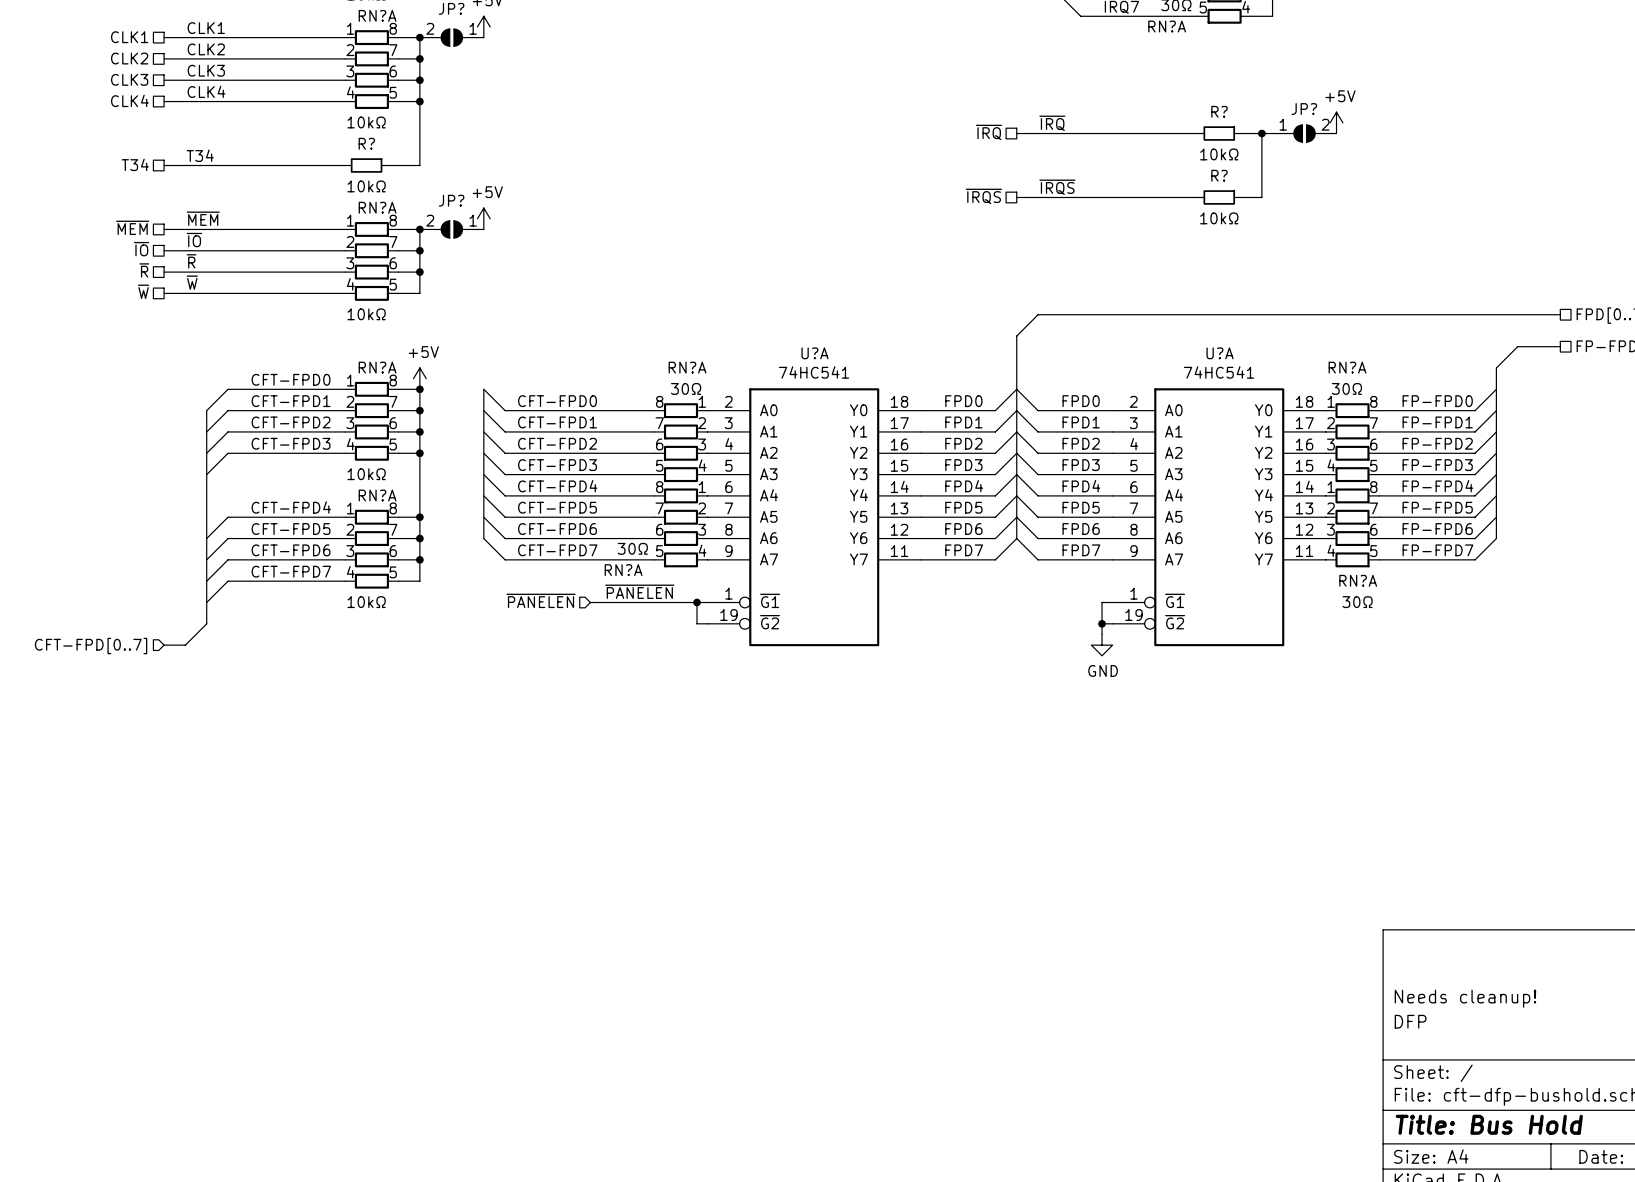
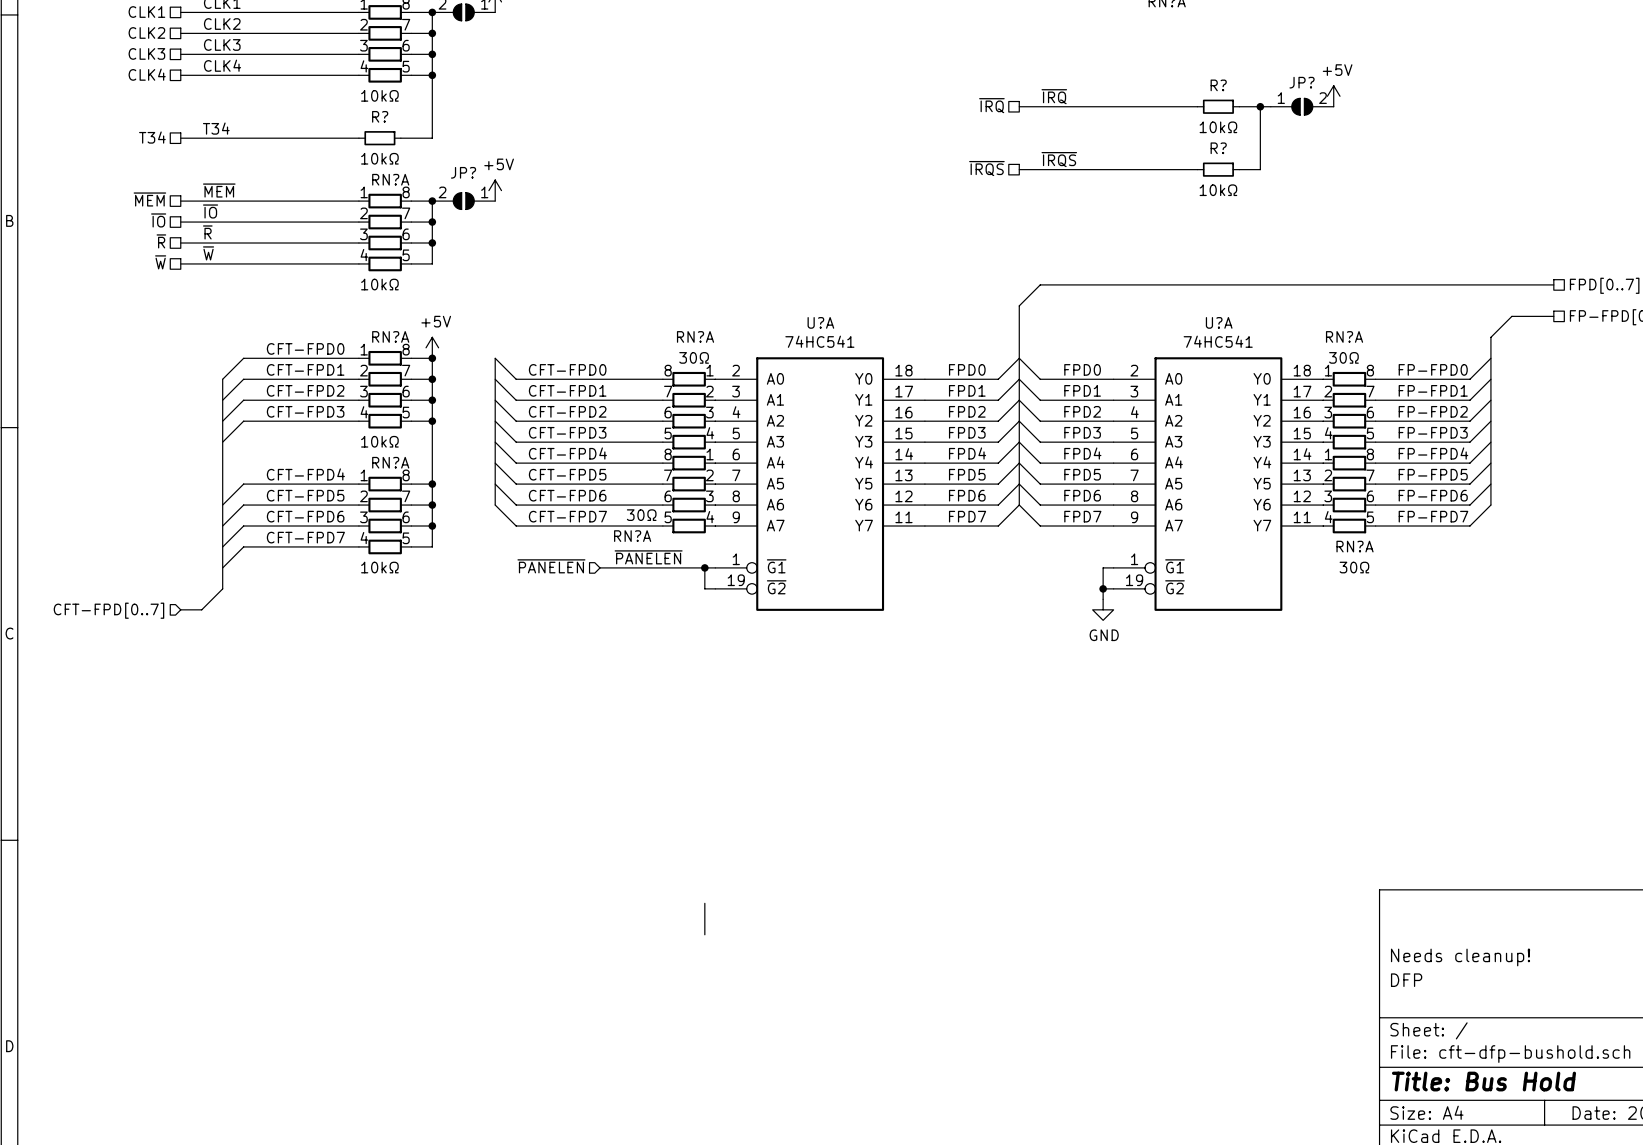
wire: none -> (704, 903) (704, 934)

